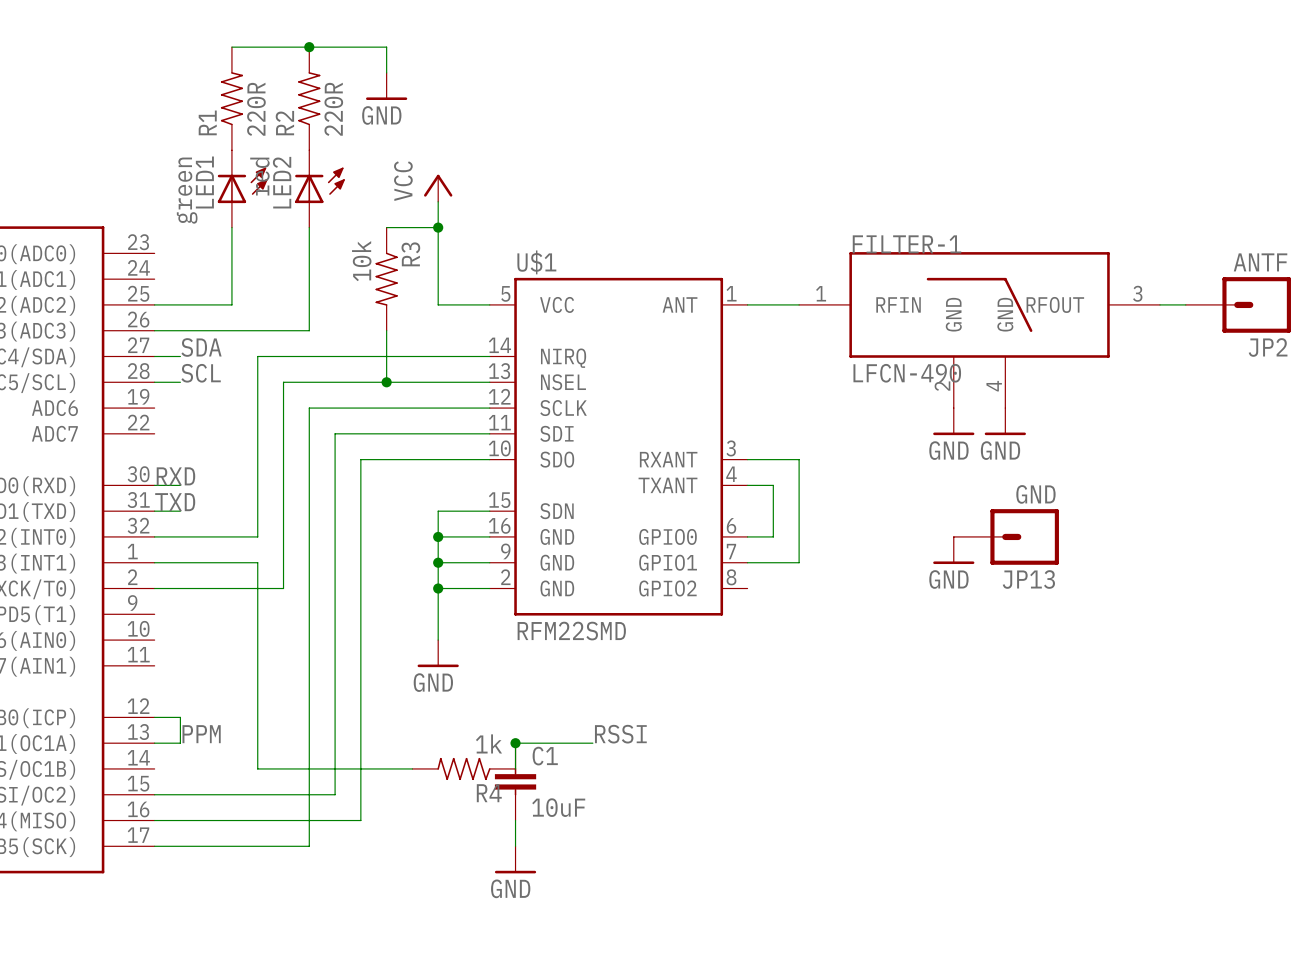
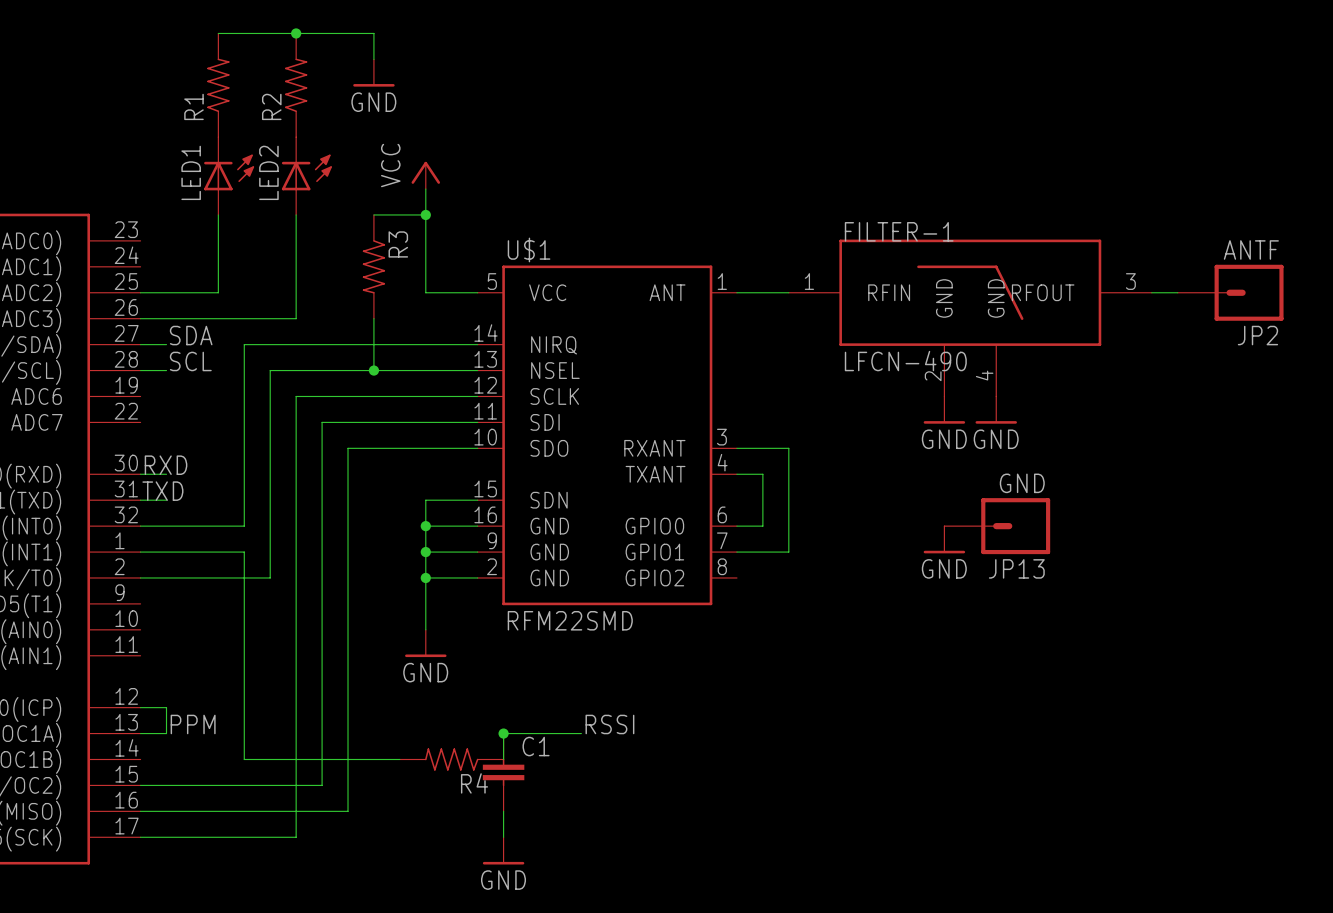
R1 value: 220R (256, 109) -> none
R2 value: 220R (333, 109) -> none
LED2 value: red (259, 176) -> none
LED1 value: green (187, 190) -> none
R3 value: 10k (361, 261) -> none
R4 value: 1k (488, 743) -> none
C1 value: 10uF (558, 807) -> none

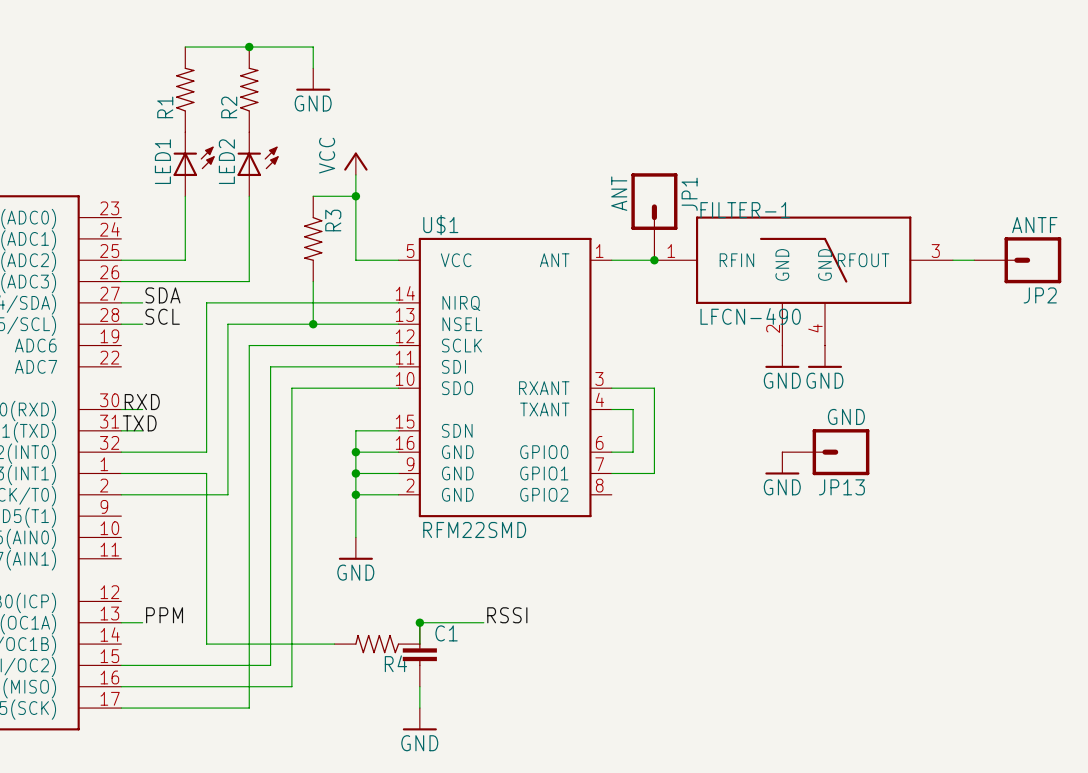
JP1: none -> ANT (654, 216)
junction: none -> (654, 260)
wire: (140, 707) (166, 707) (166, 733) -> none

